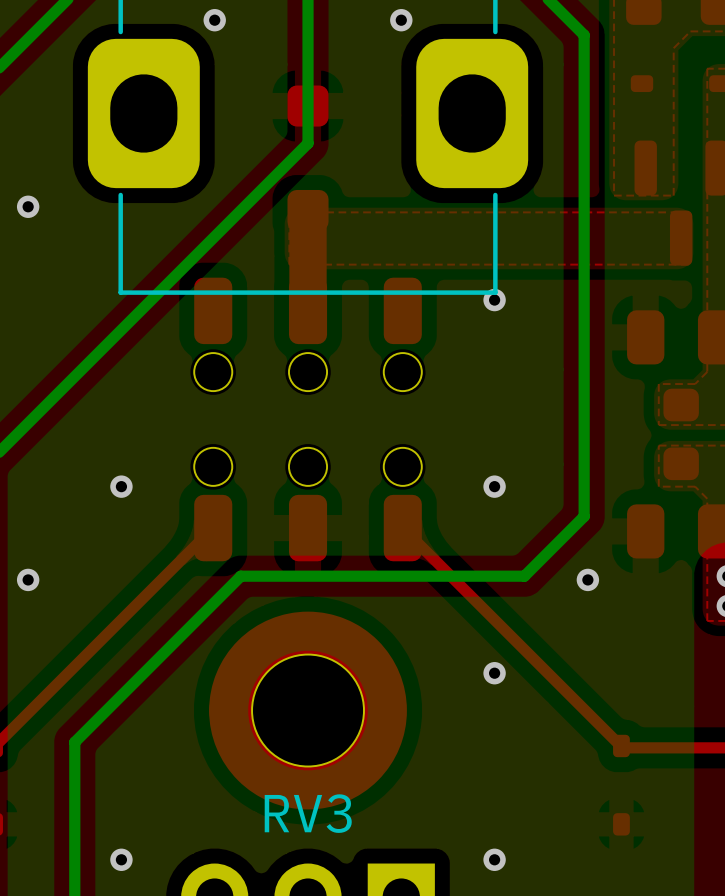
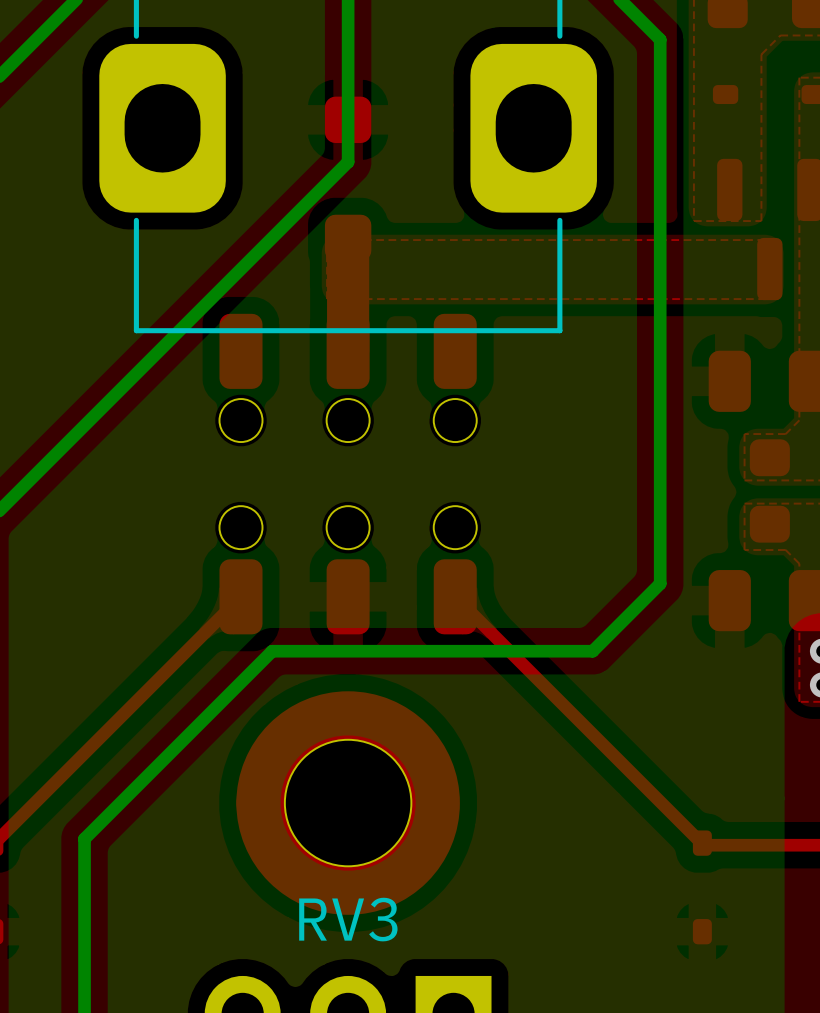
via: (214, 20) -> none
via: (401, 20) -> none
via: (28, 206) -> none
via: (494, 300) -> none
via: (121, 486) -> none
via: (494, 486) -> none
via: (28, 579) -> none
via: (587, 579) -> none
via: (494, 673) -> none
via: (121, 859) -> none
via: (494, 859) -> none

